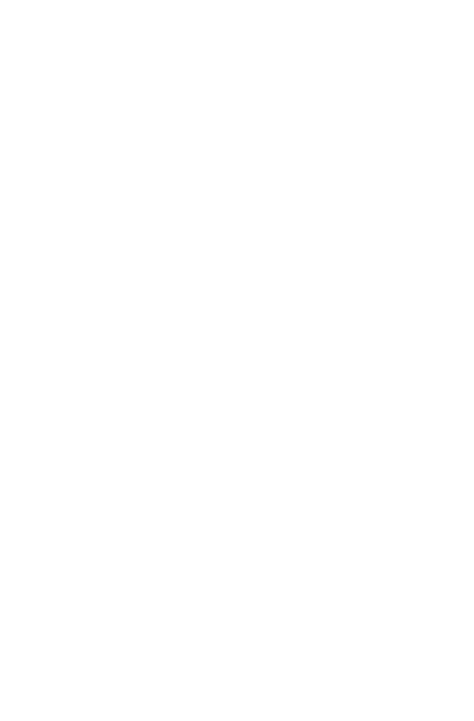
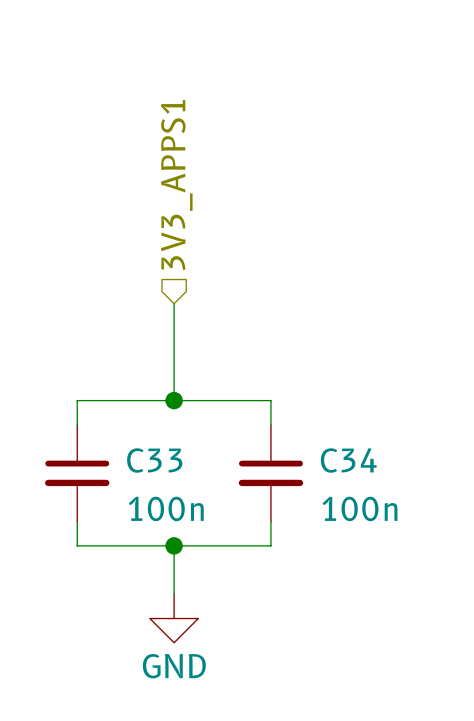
hierarchical label: none -> 3V3_APPS1 (176, 184)
wire: none -> (174, 303) (174, 400)
junction: none -> (174, 400)
wire: none -> (77, 424) (77, 400) (270, 400) (270, 424)
C33: none -> 100n (77, 473)
C34: none -> 100n (270, 473)
wire: none -> (77, 521) (77, 545) (270, 545) (270, 521)
wire: none -> (174, 545) (174, 594)
junction: none -> (174, 545)
power symbol: none -> GND (174, 618)

